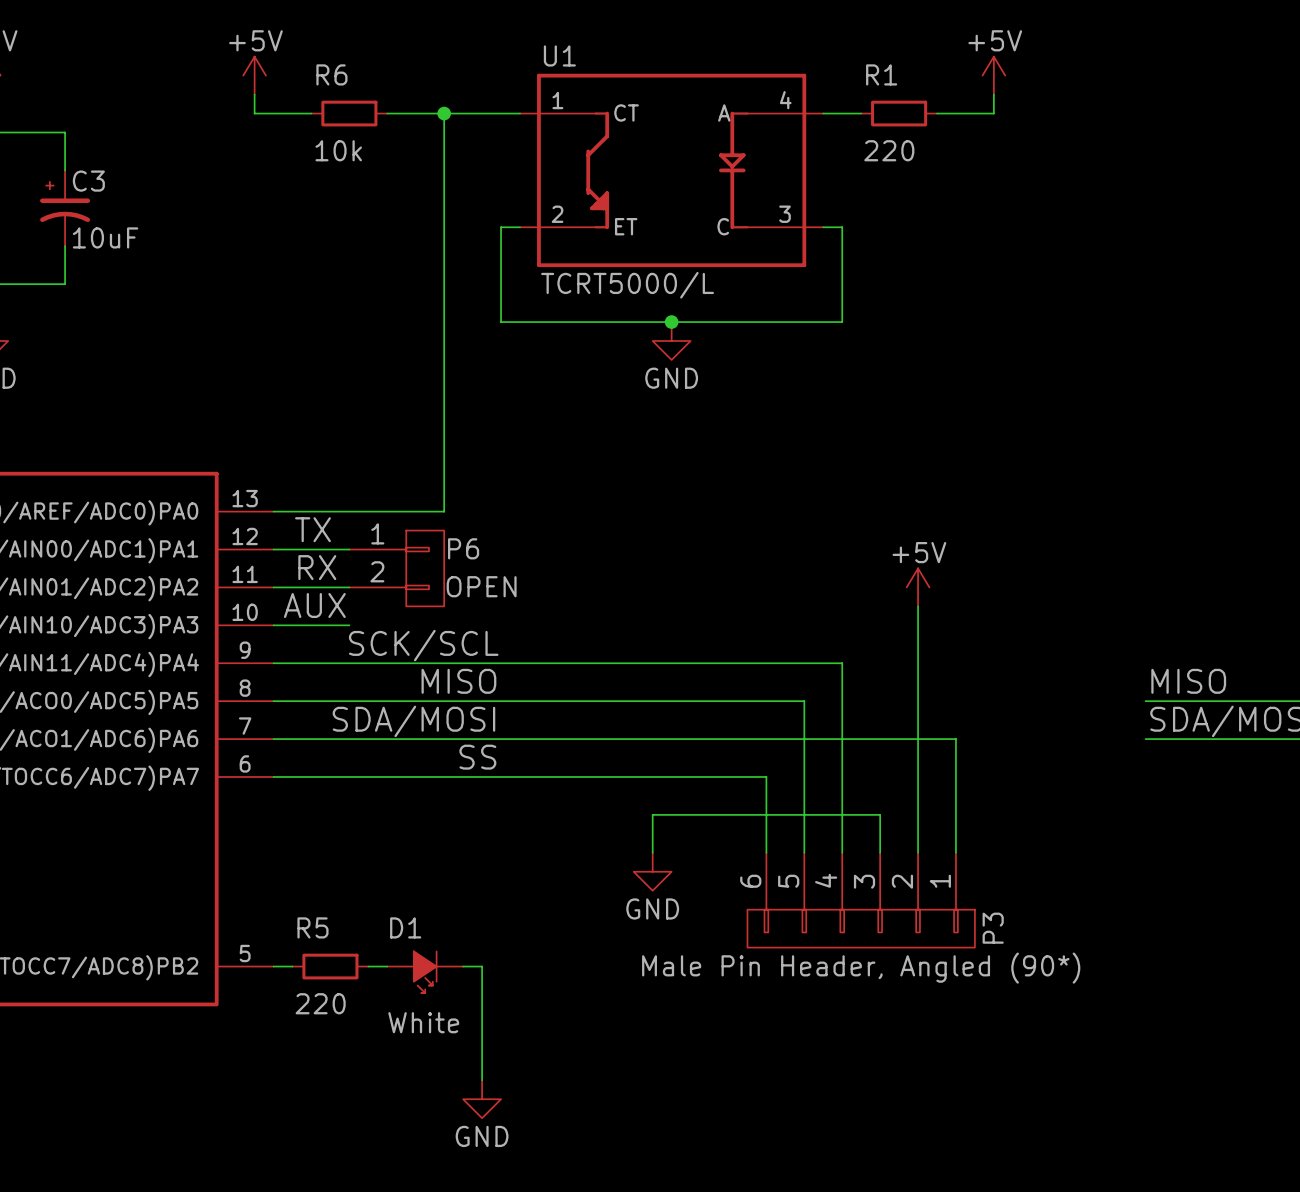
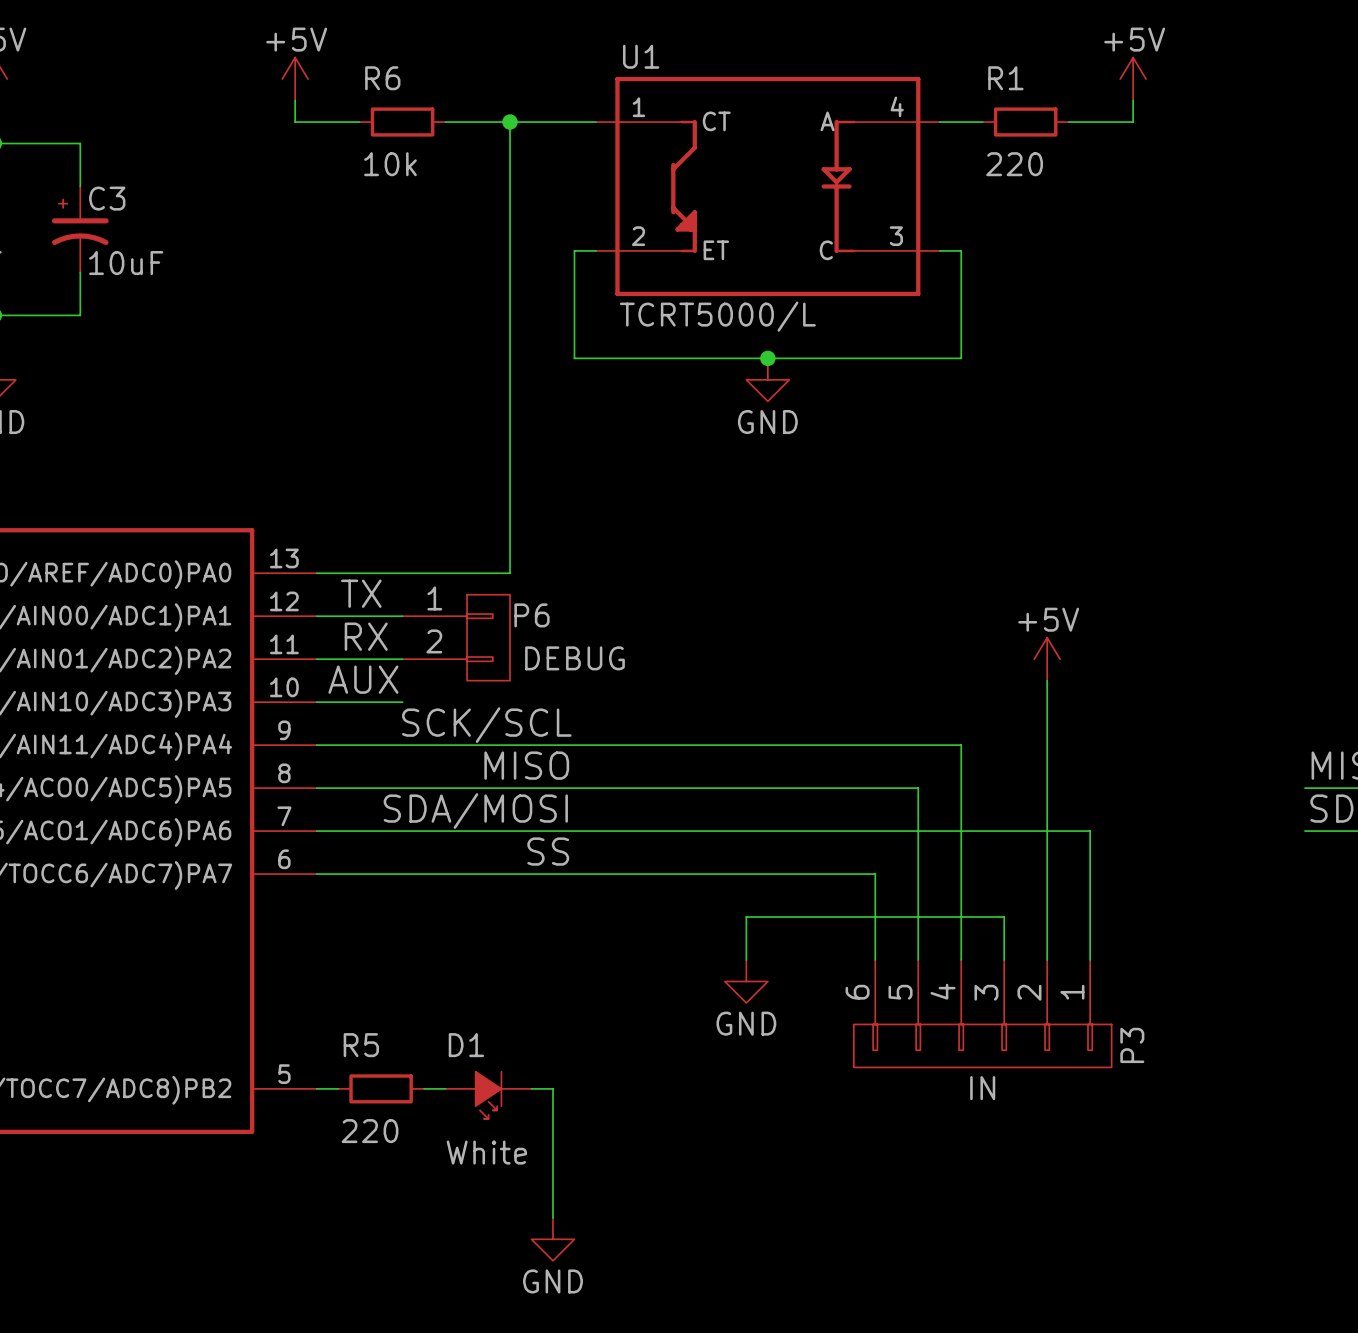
P6 value: OPEN (481, 586) -> DEBUG (574, 658)
P3 value: Male Pin Header, Angled (90*) (861, 968) -> IN (982, 1088)

